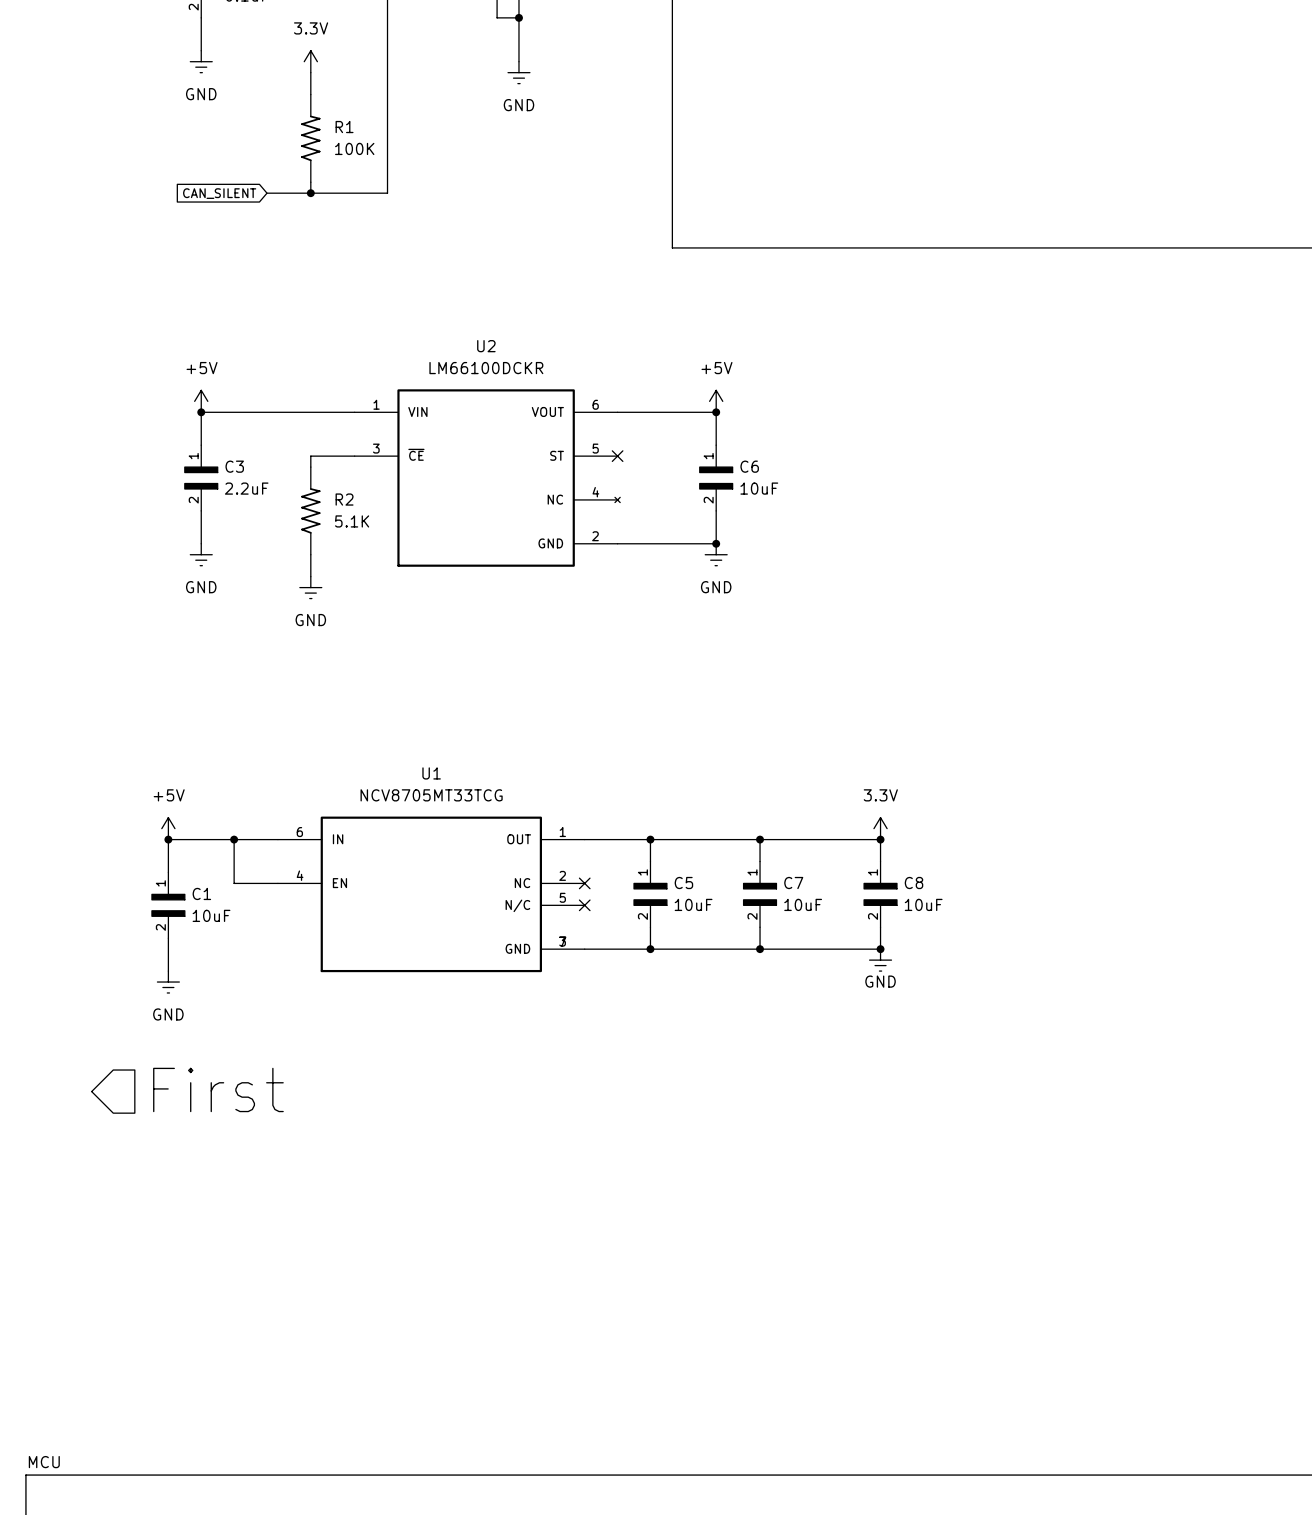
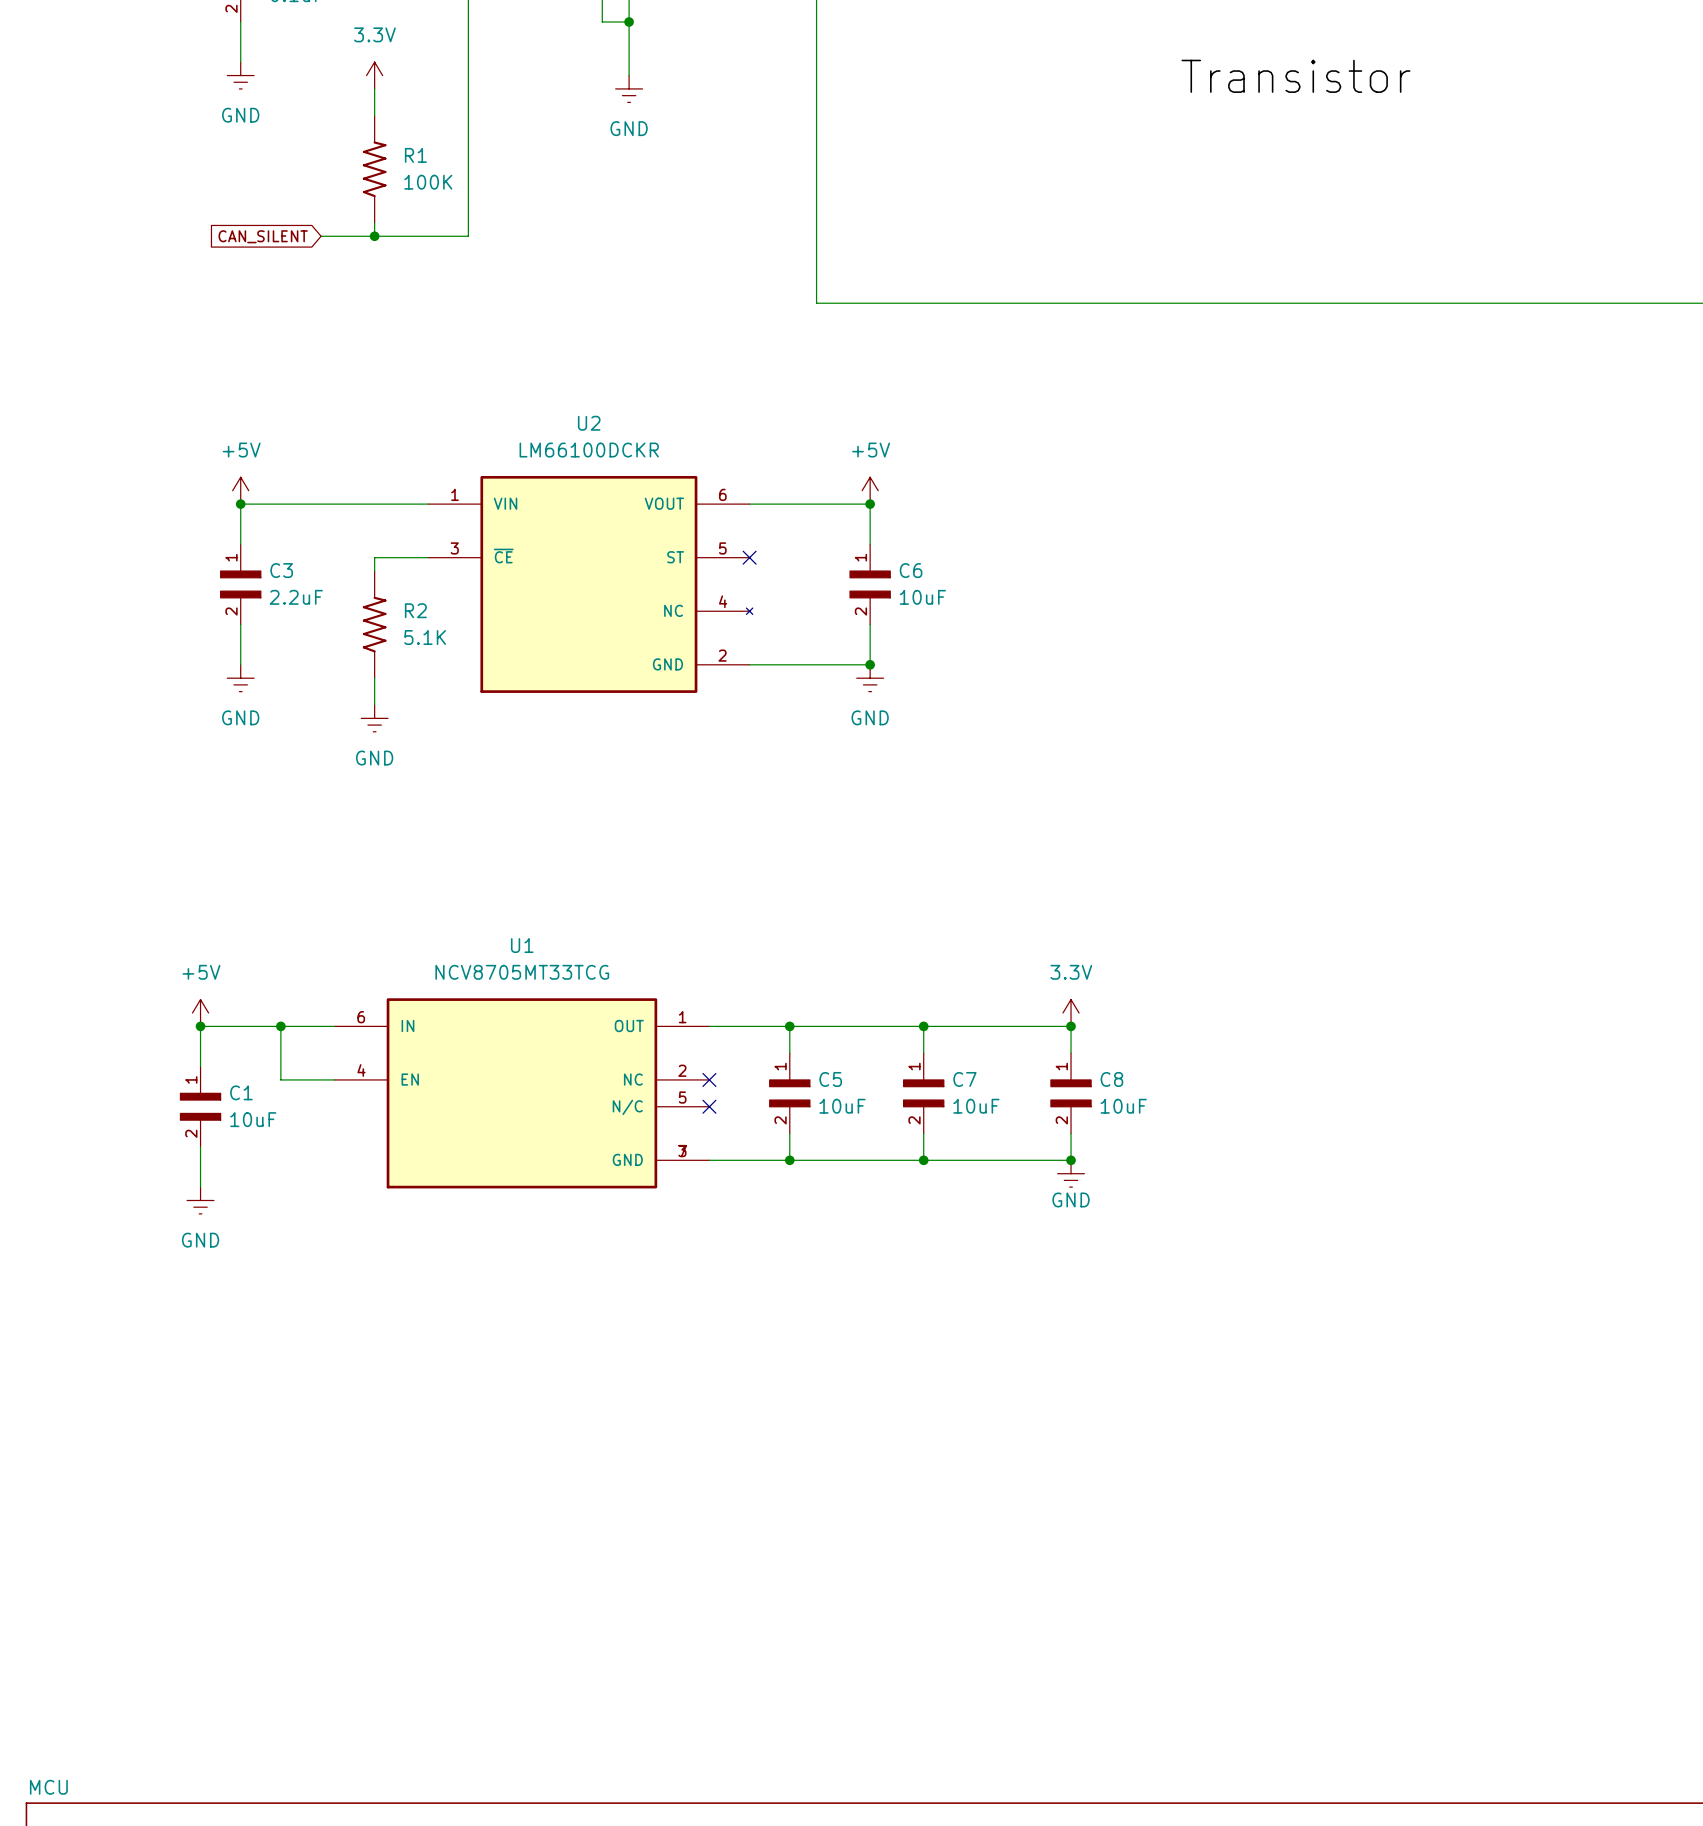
label: none -> Transistor (1295, 76)
hierarchical label: First (218, 1089) -> none

